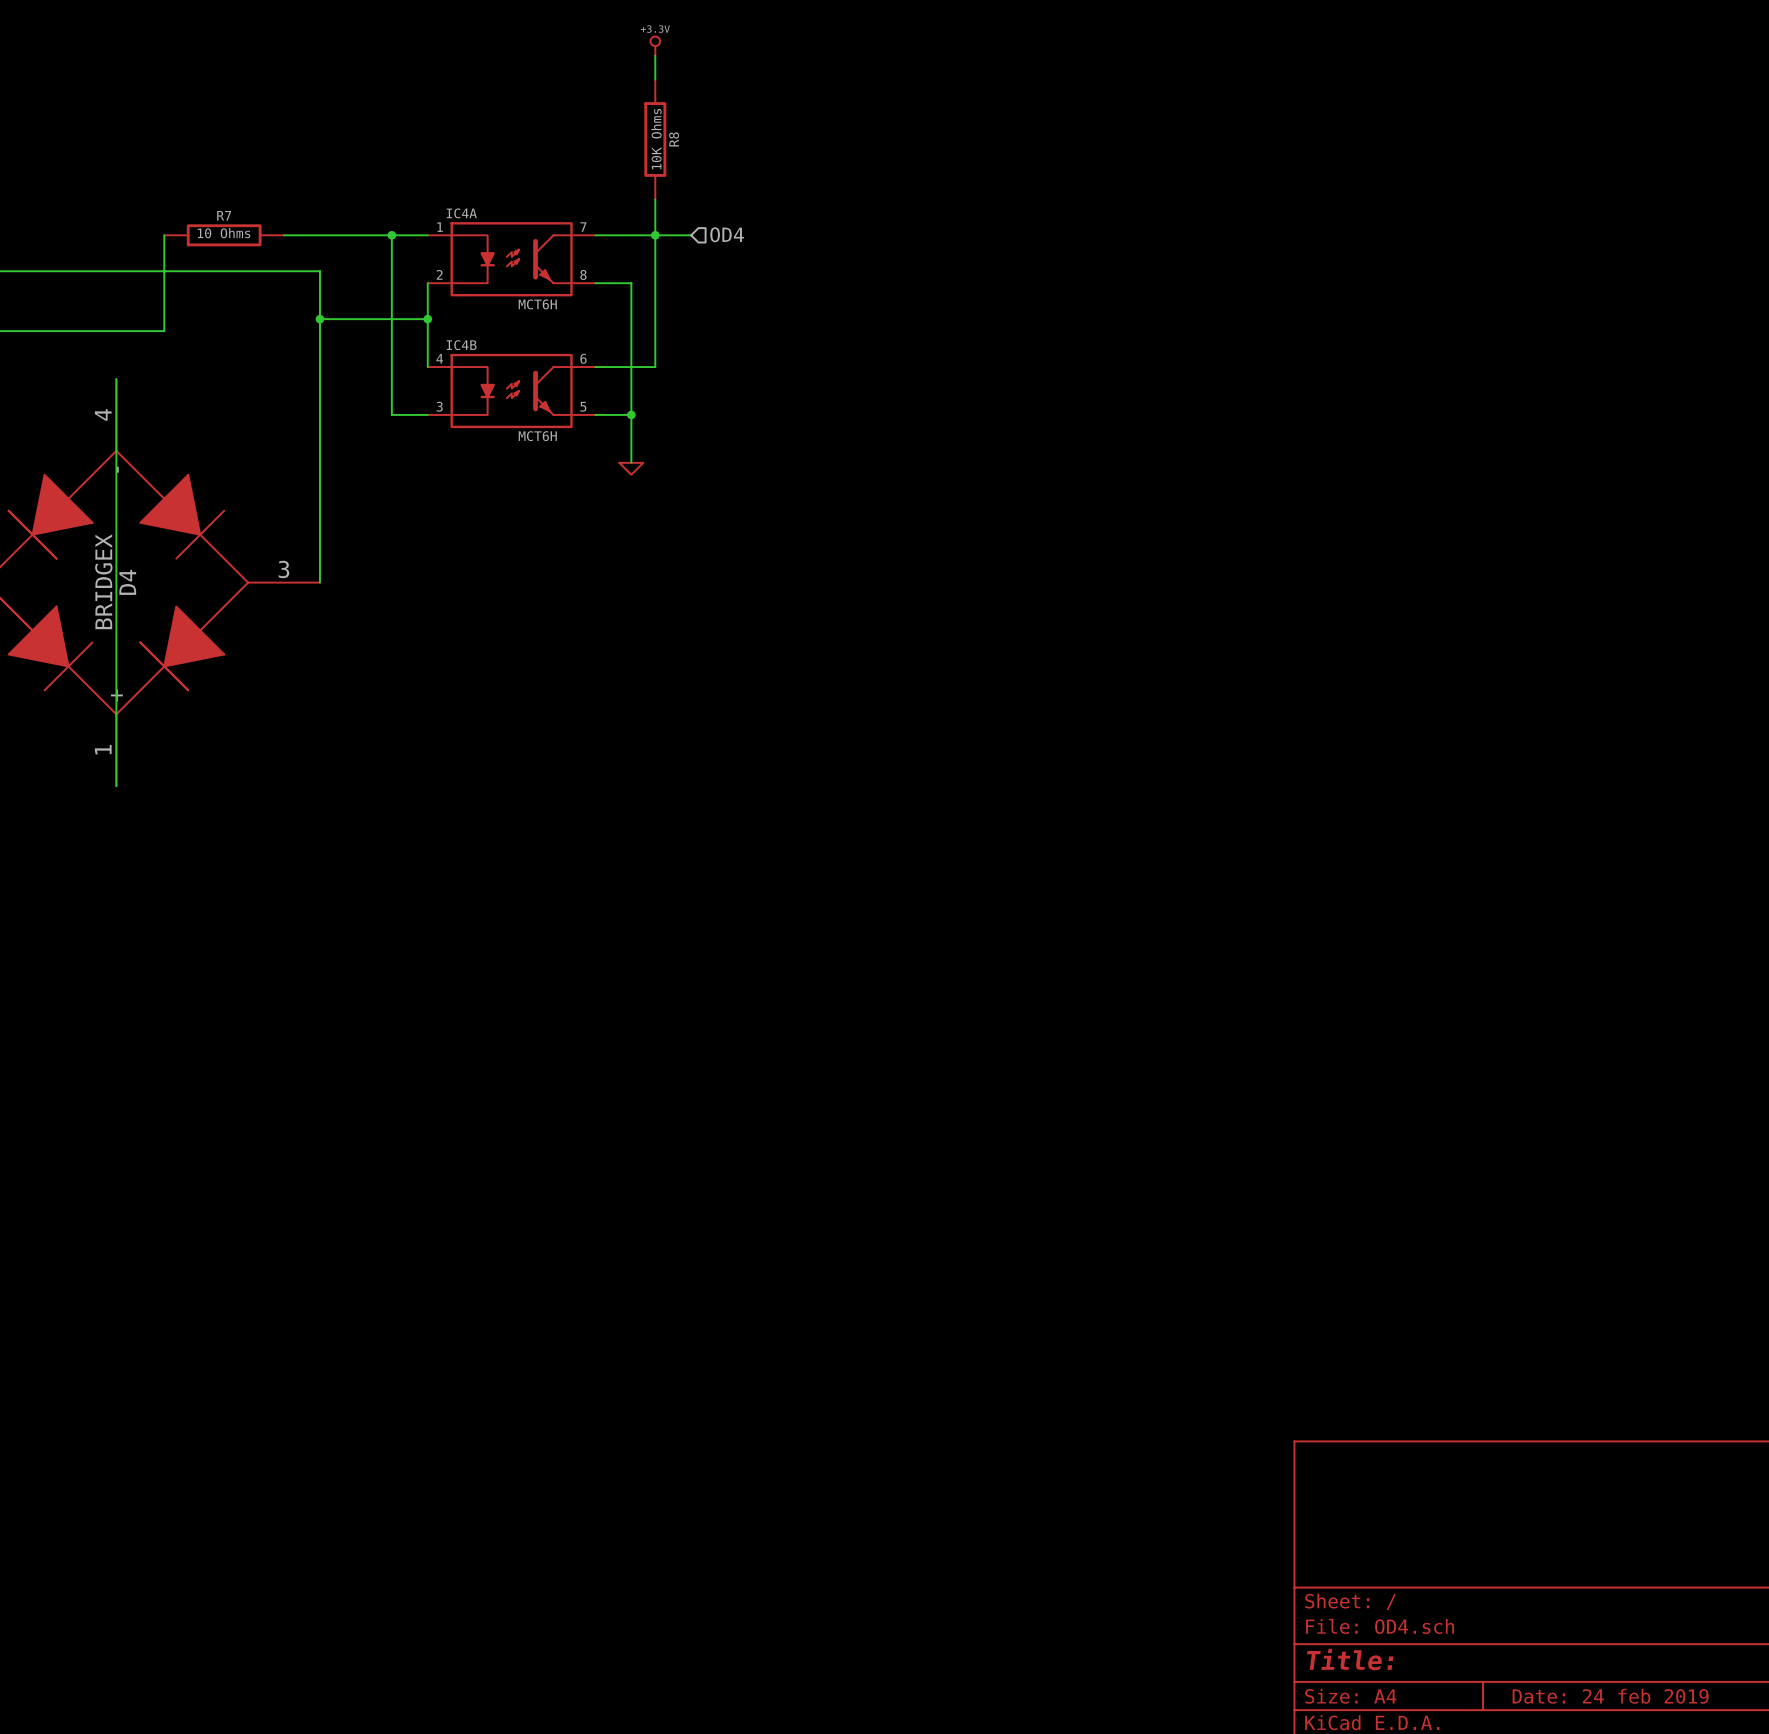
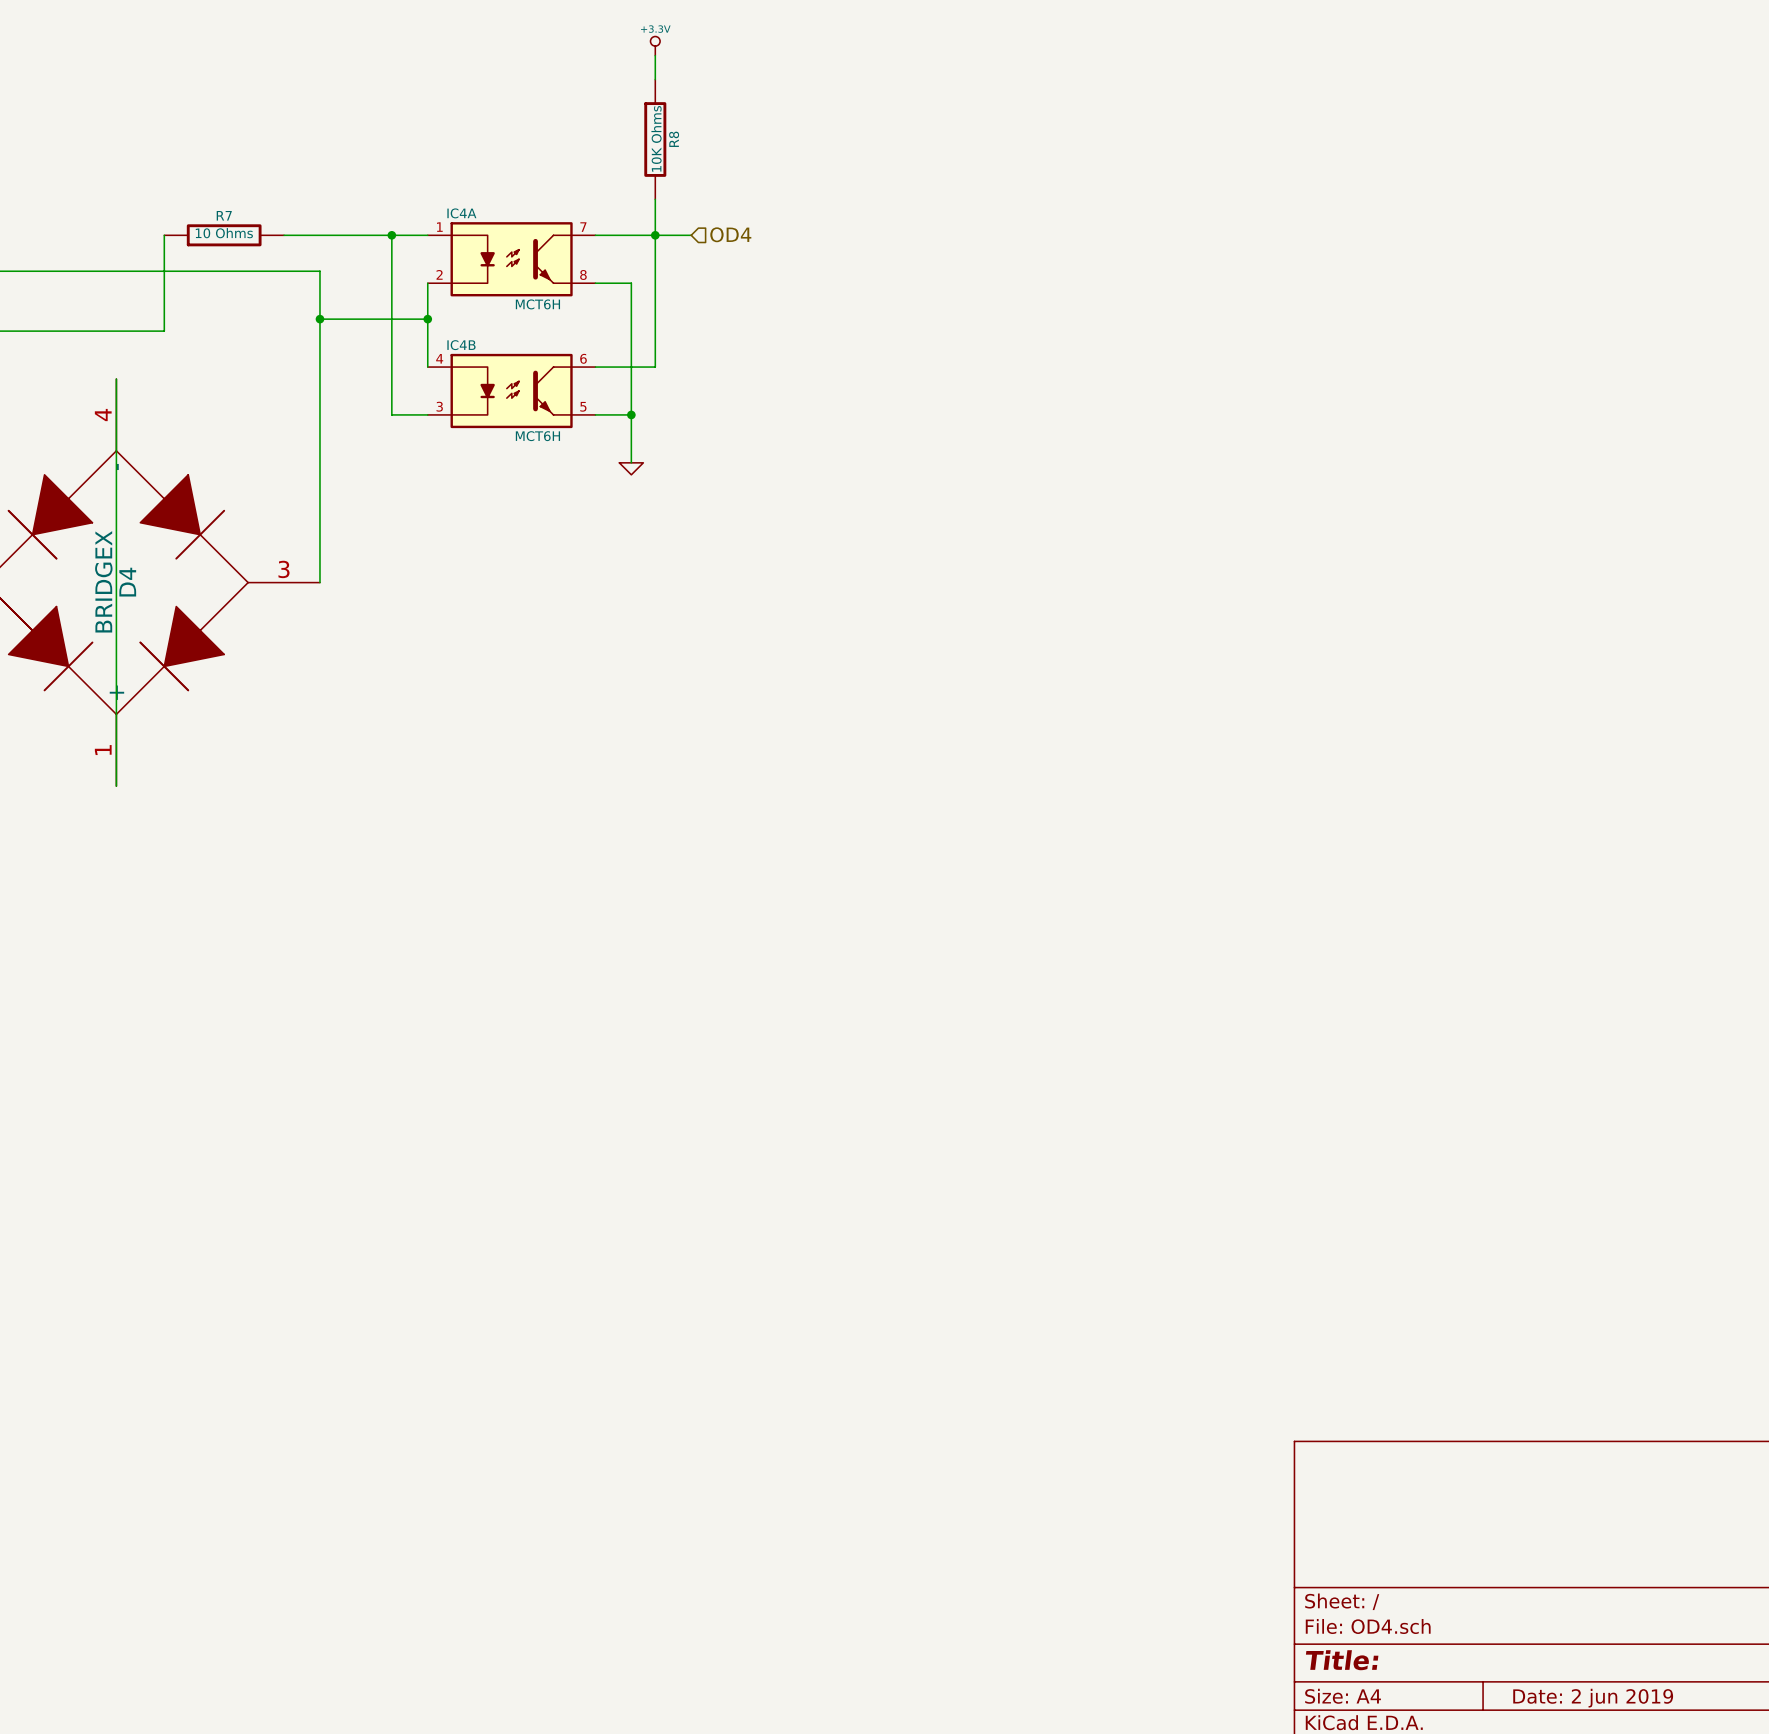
title block: Date: 24 feb 2019 (1610, 1696) -> Date: 2 jun 2019 (1593, 1698)

